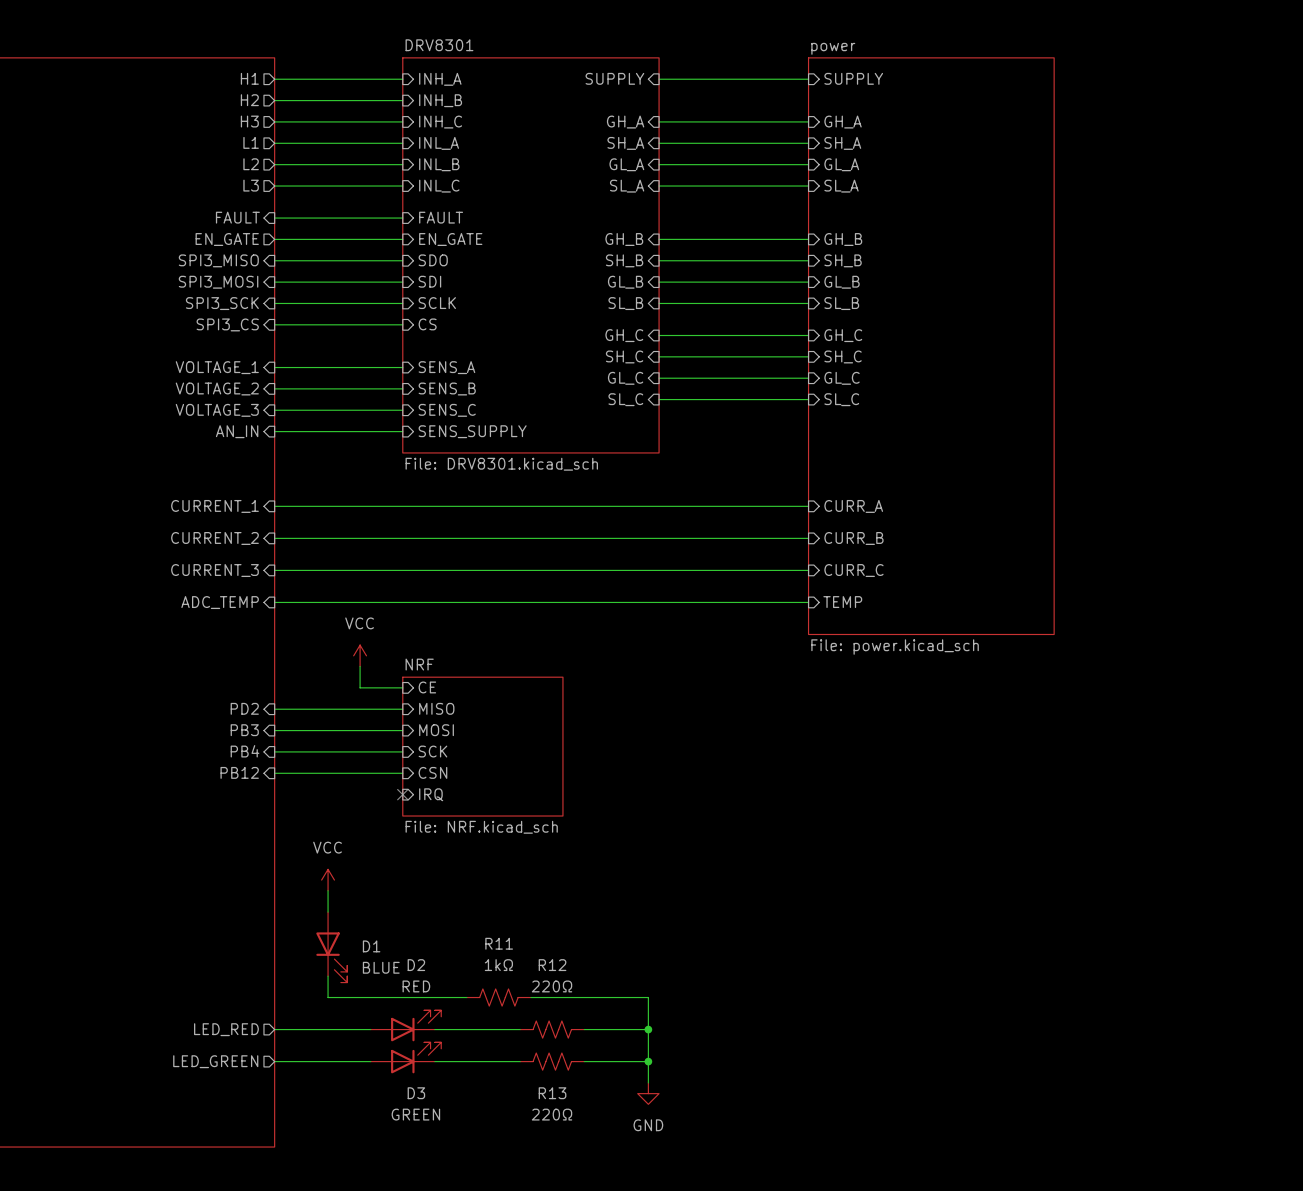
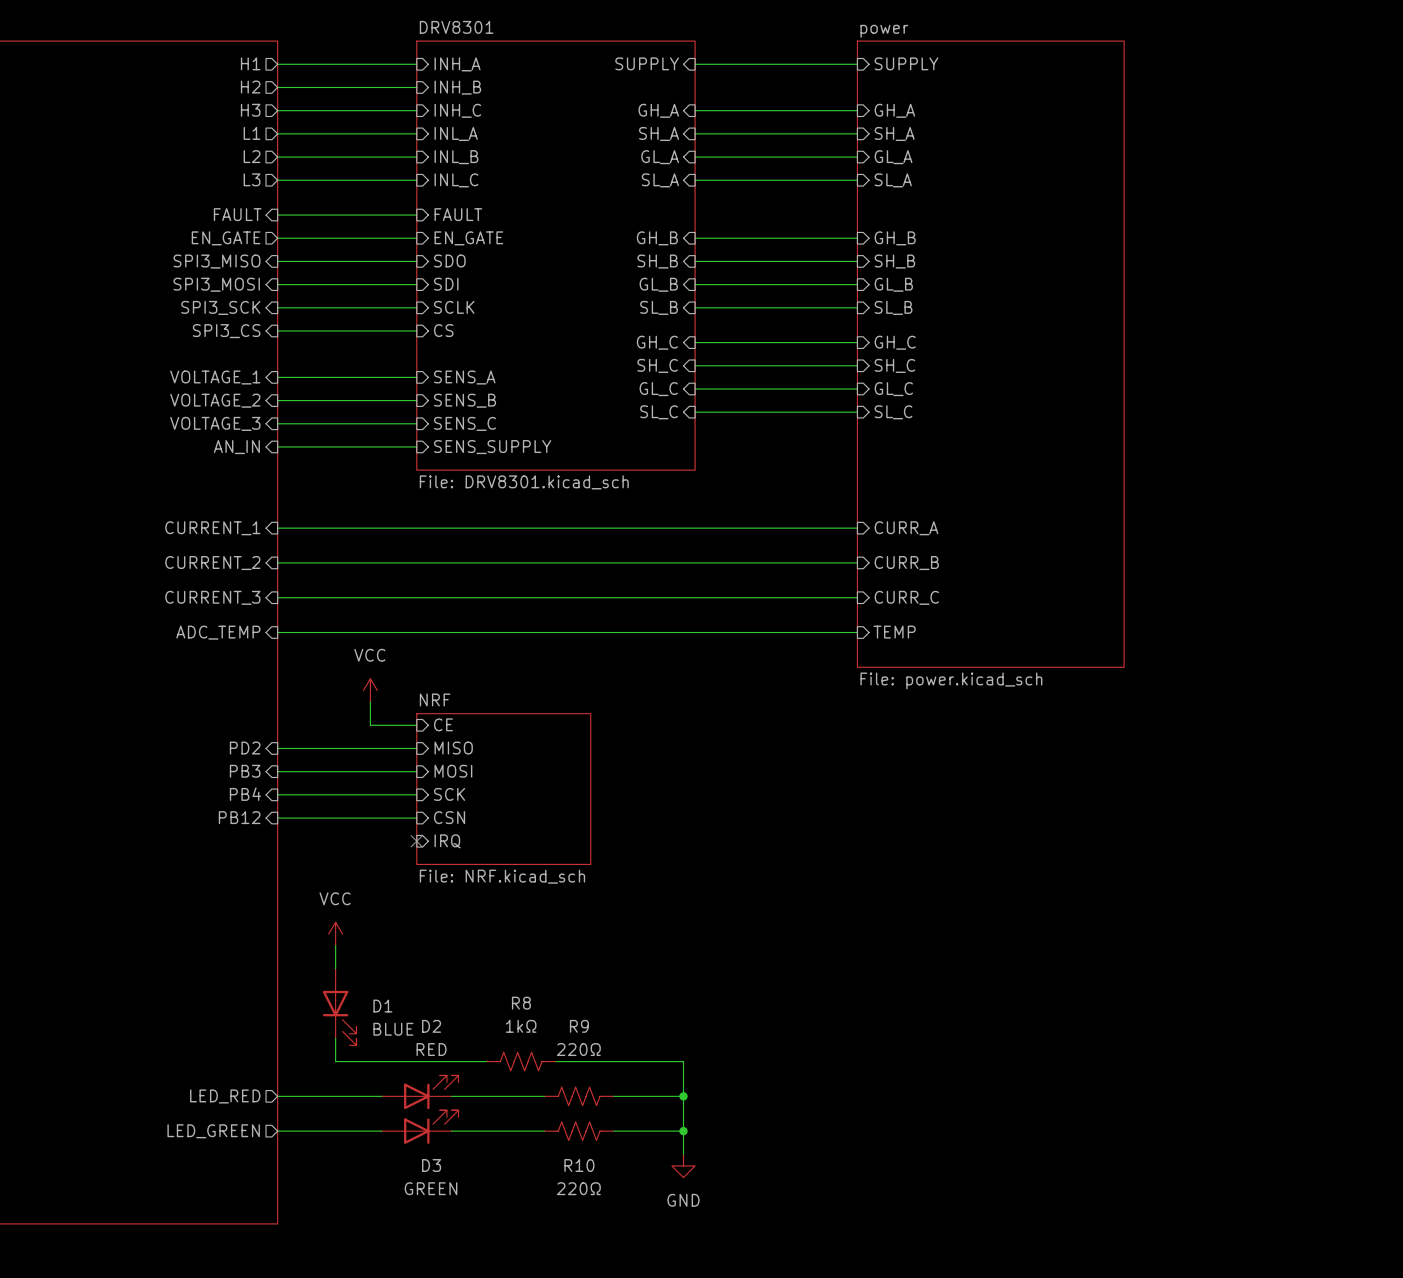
R11 name: R11 (499, 943) -> R8 (521, 1003)
R12 name: R12 (552, 965) -> R9 (579, 1026)
R13 name: R13 (552, 1093) -> R10 (579, 1165)

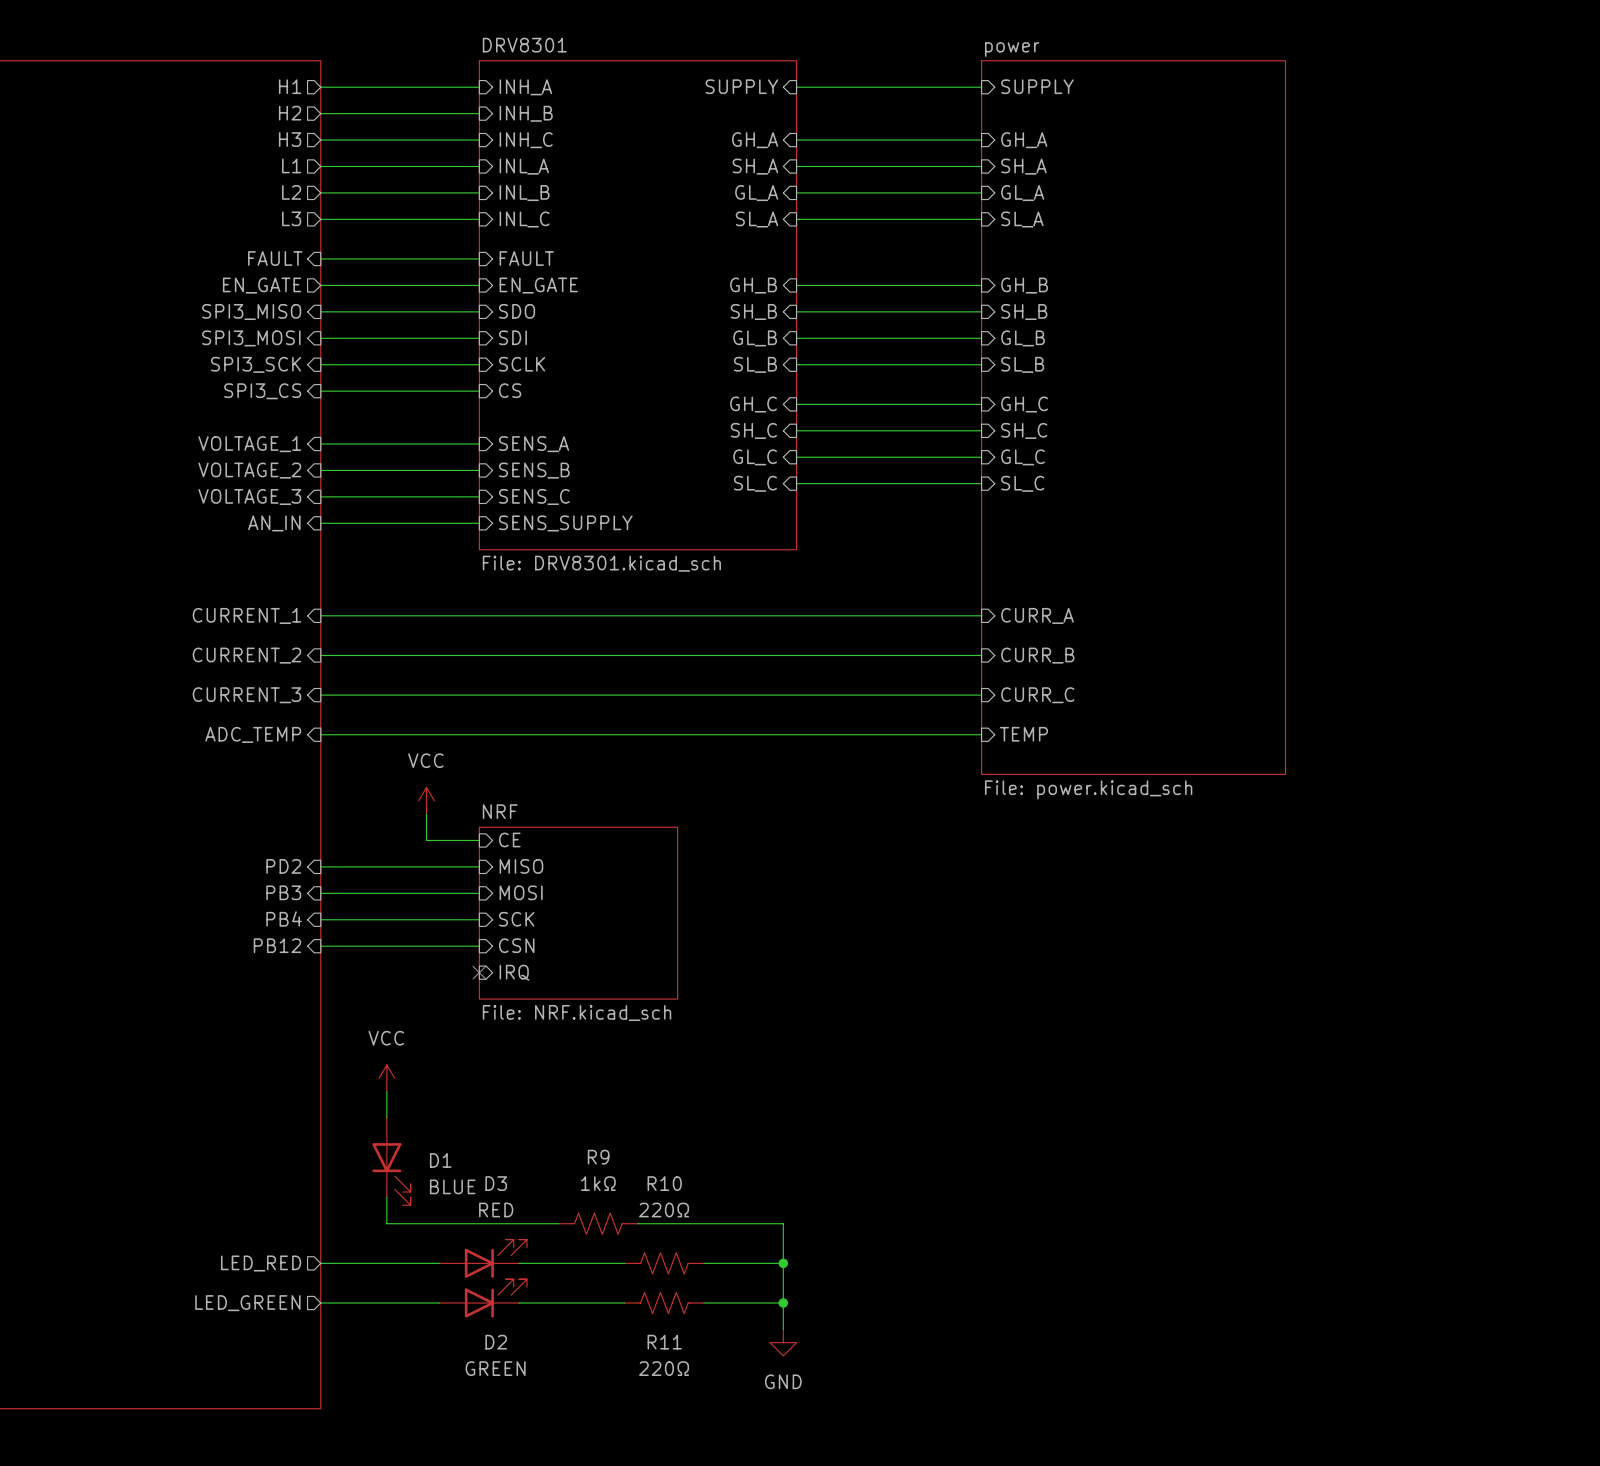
R8 name: R8 (521, 1003) -> R9 (598, 1157)
D2 name: D2 (431, 1026) -> D3 (496, 1183)
R9 name: R9 (579, 1026) -> R10 (664, 1183)
D3 name: D3 (431, 1165) -> D2 (496, 1342)
R10 name: R10 (579, 1165) -> R11 (664, 1342)

